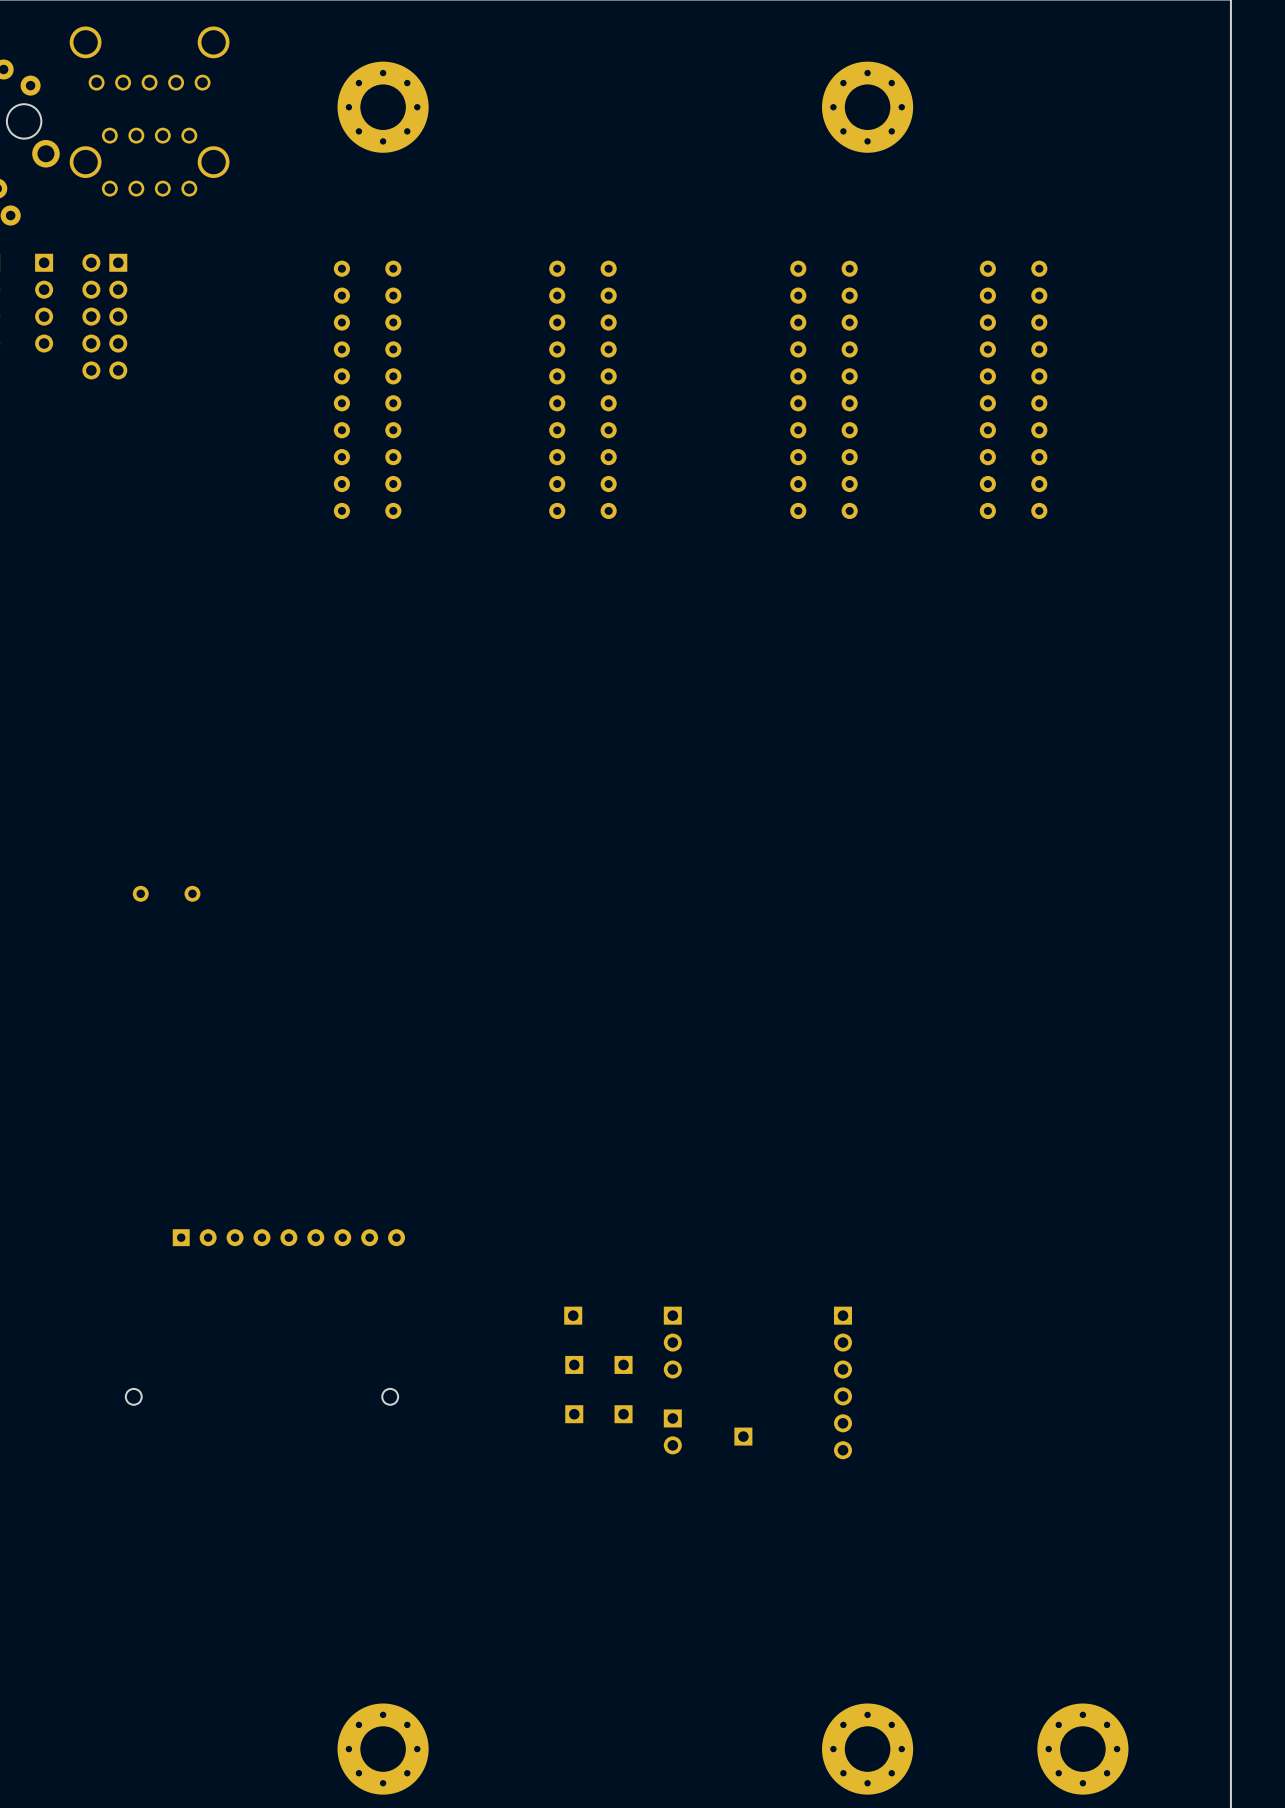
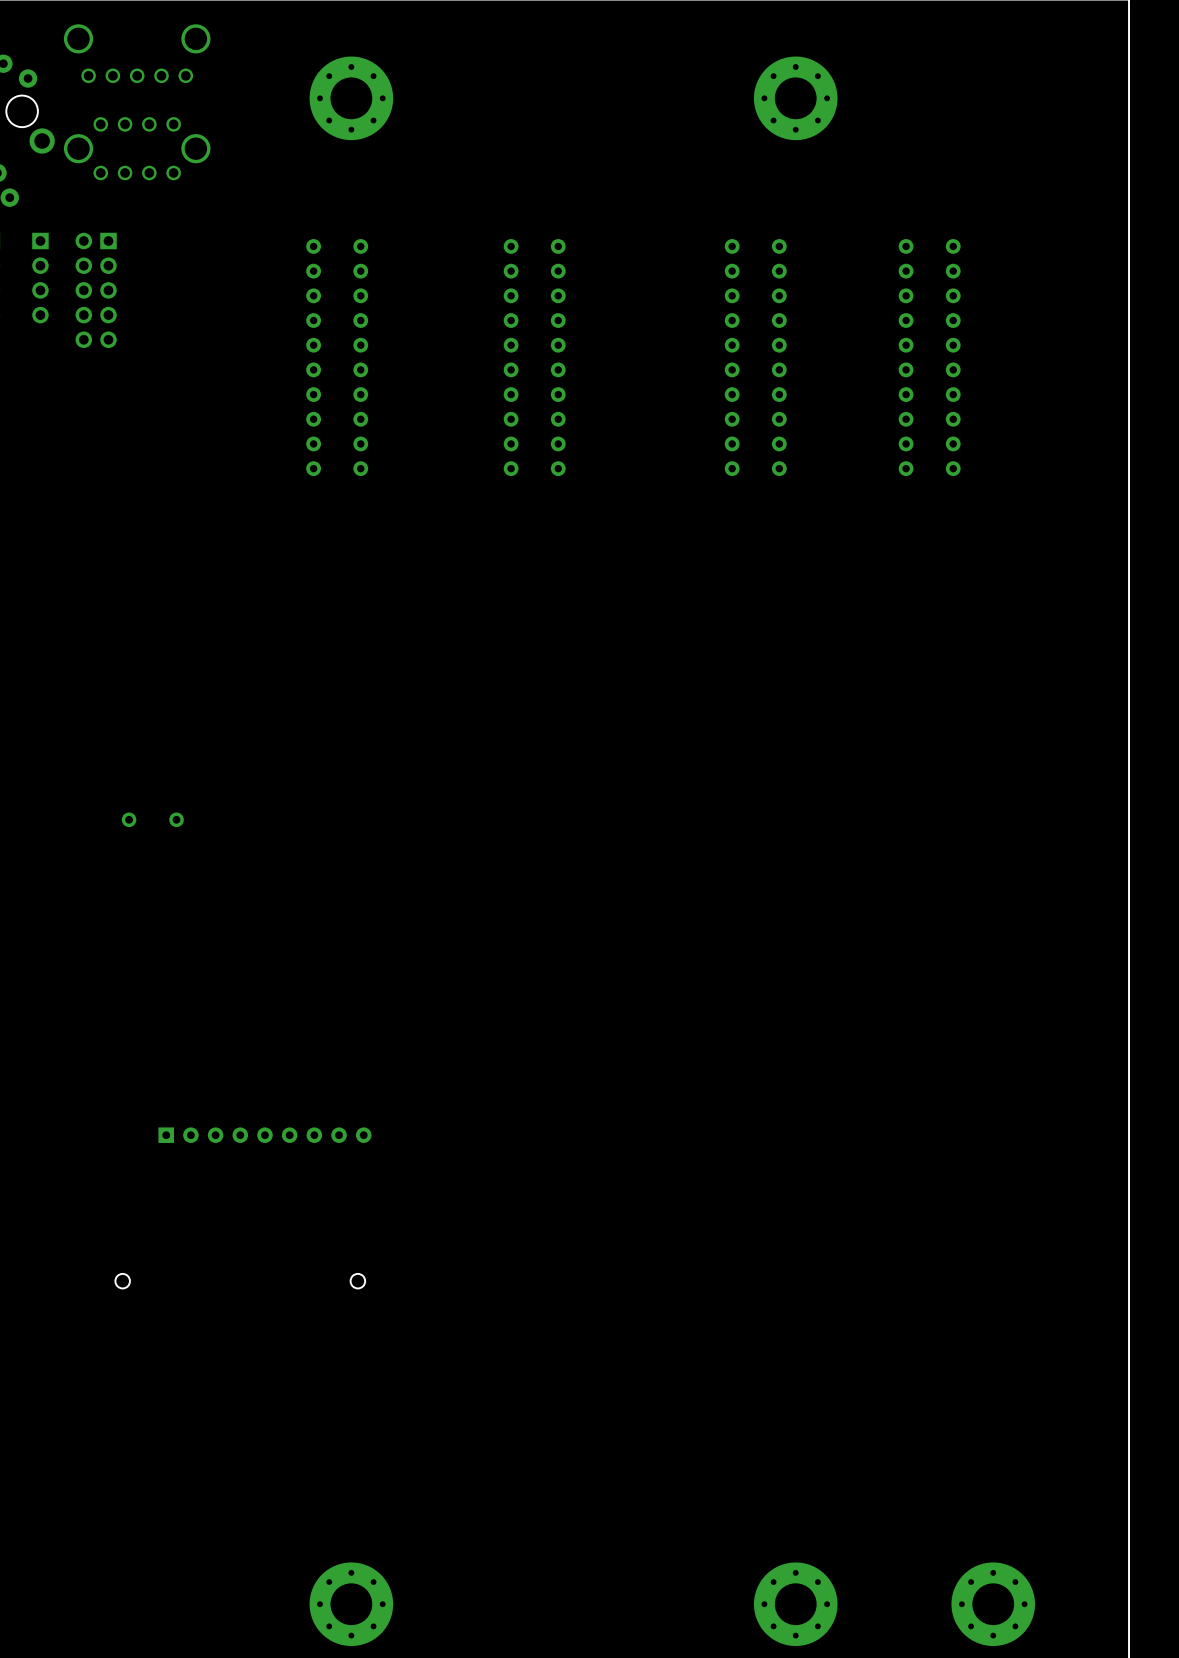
part: (573, 1315) -> none
part: (672, 1342) -> none
part: (574, 1364) -> none
part: (623, 1364) -> none
part: (842, 1382) -> none
part: (574, 1414) -> none
part: (623, 1414) -> none
part: (672, 1431) -> none
part: (743, 1436) -> none

